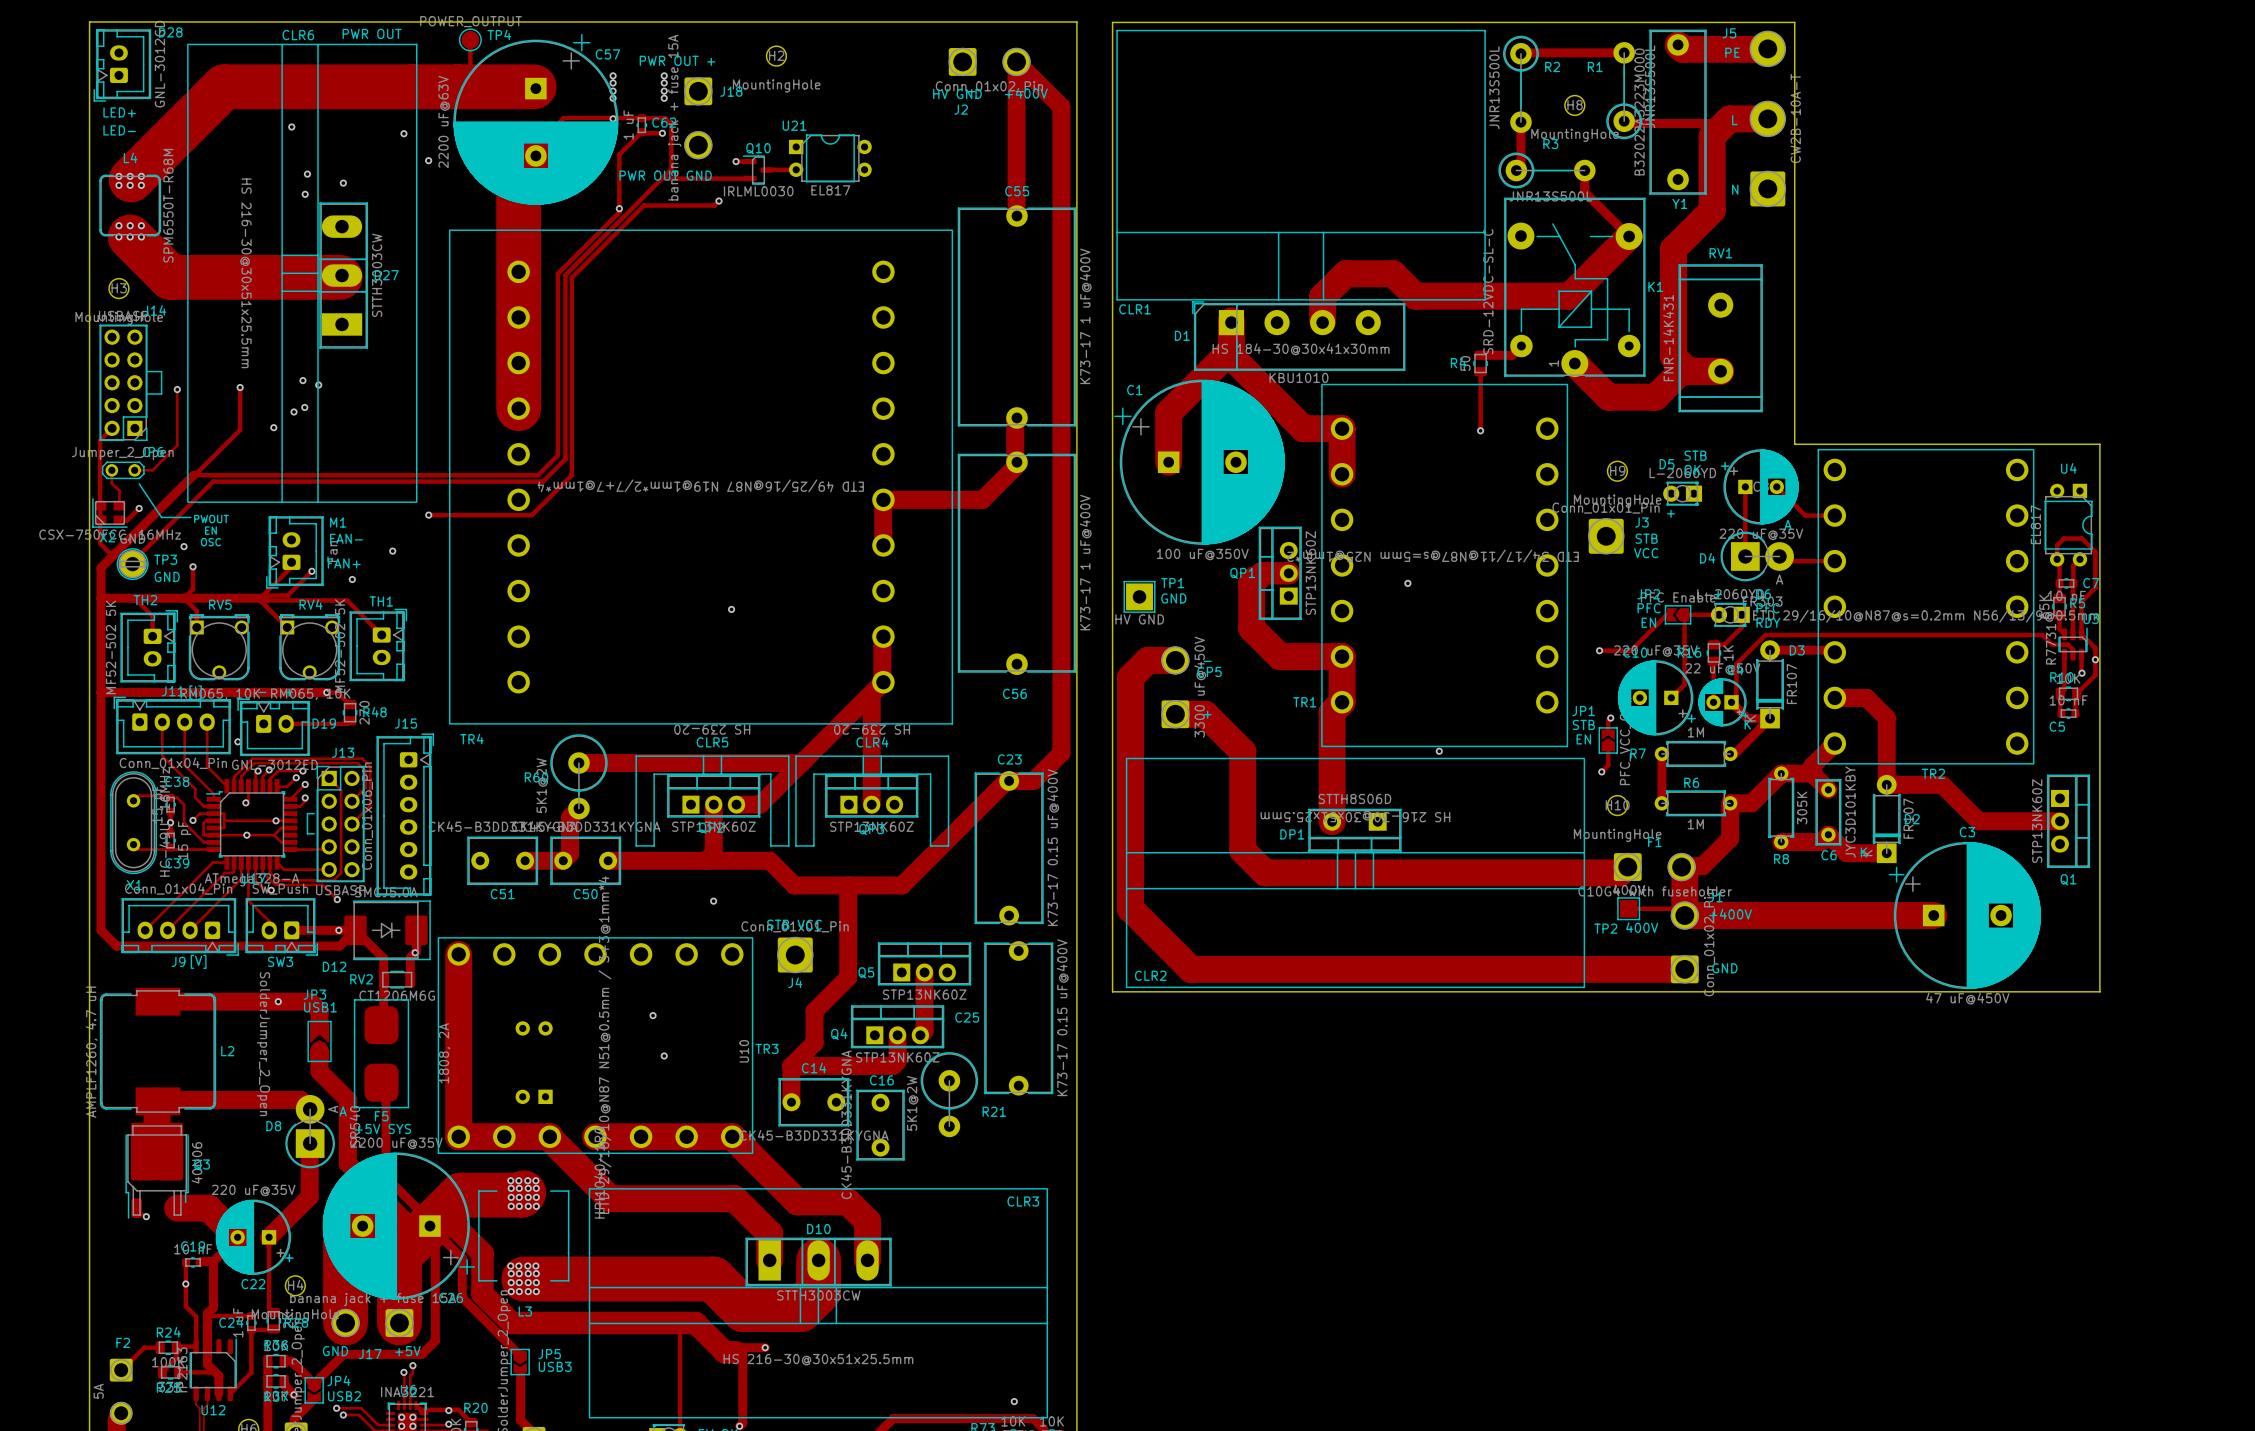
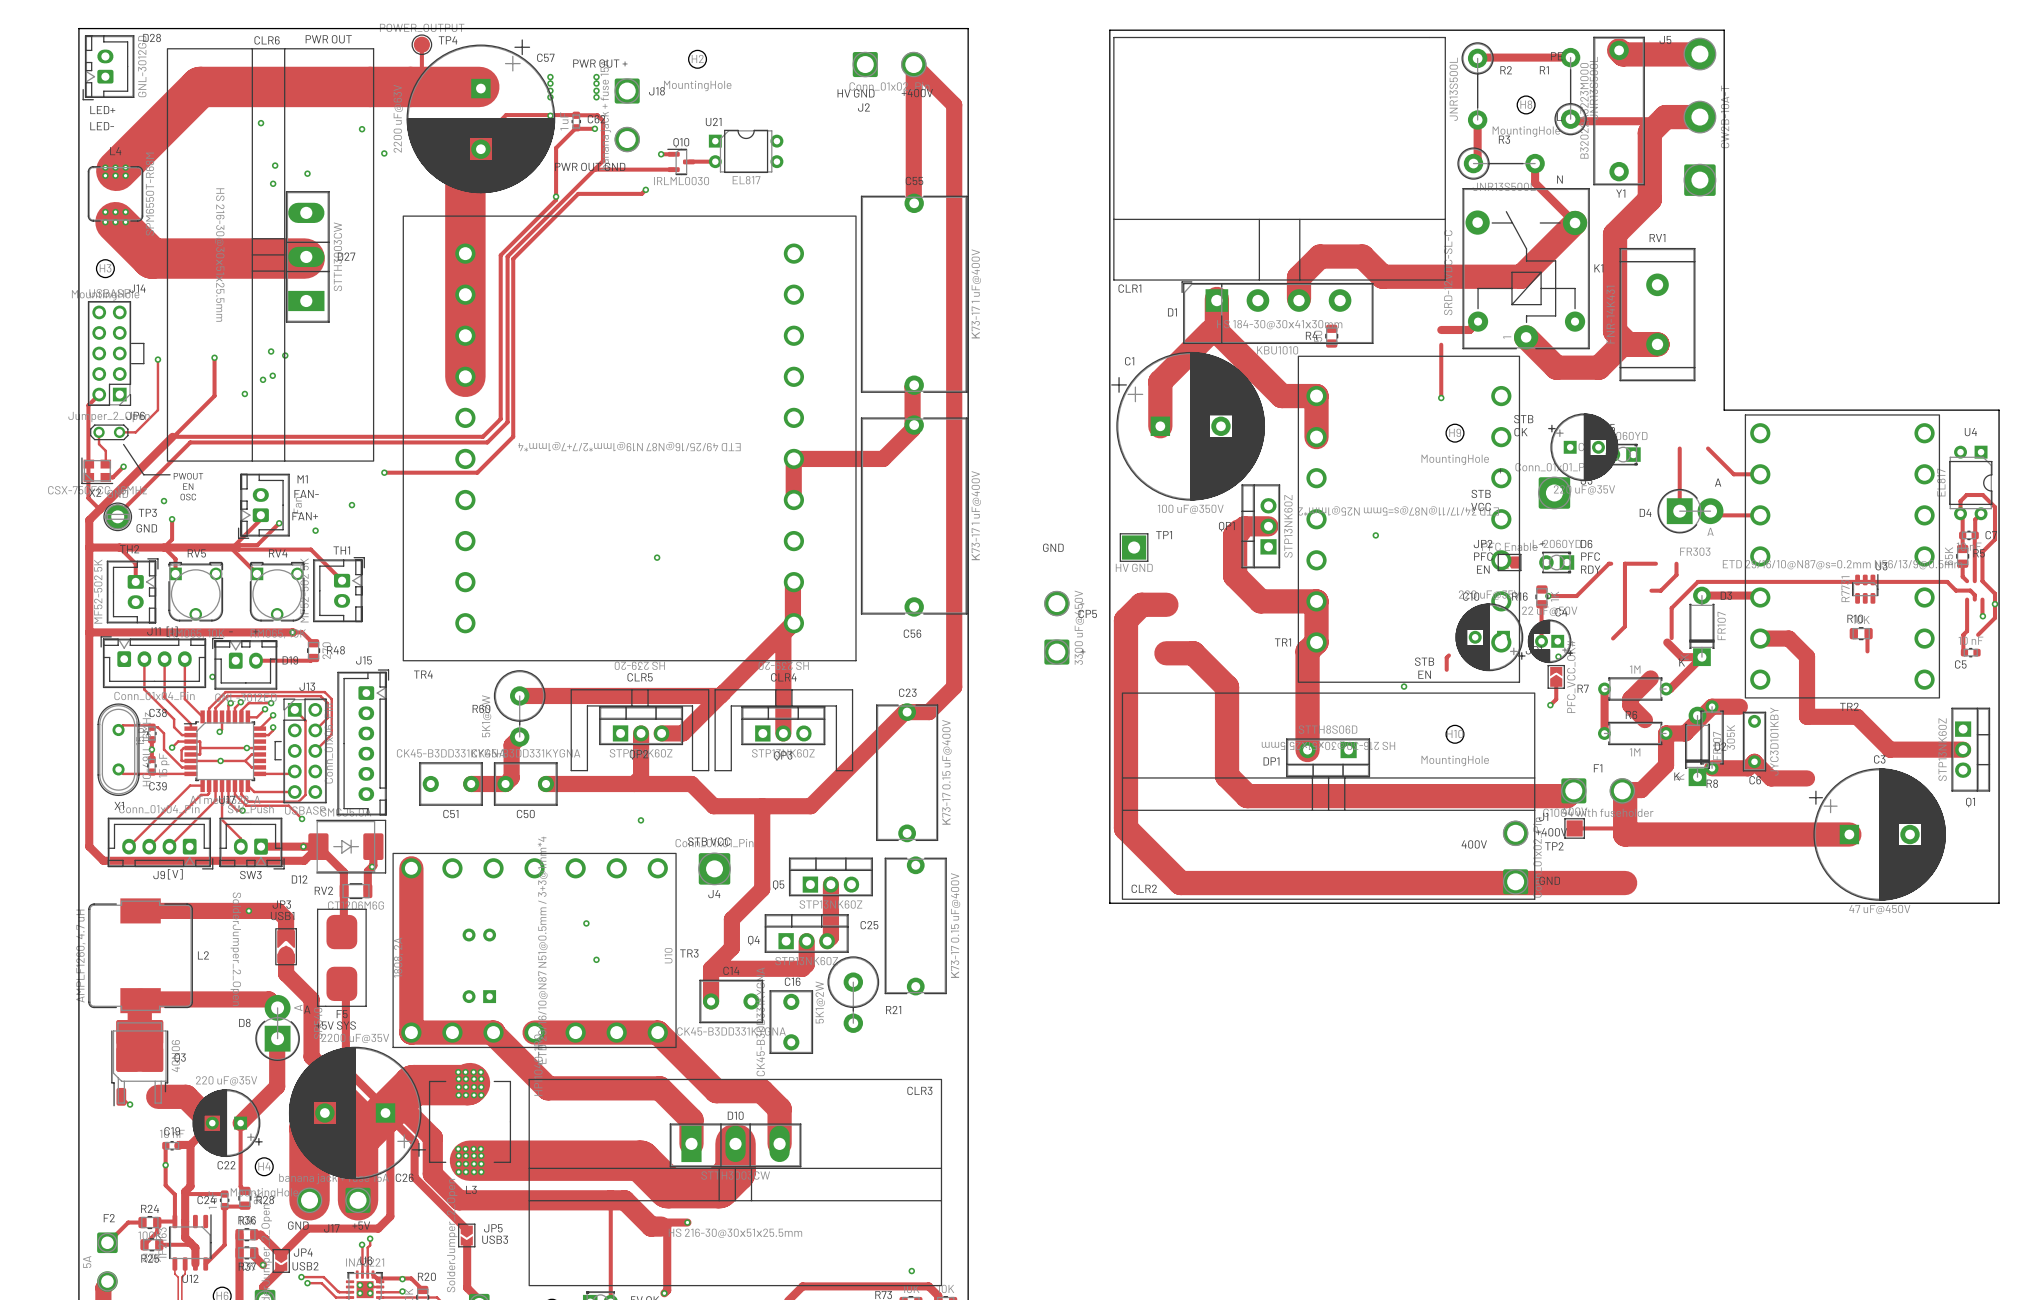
board edge: (1112, 22) (1794, 22) (1794, 444) (2099, 444) (2099, 991) (1112, 991) (1112, 22) -> (1109, 30) (1724, 30) (1724, 410) (1999, 410) (1999, 903) (1109, 903) (1109, 30)
track: (1678, 44) (1682, 49) (1767, 49) -> (1619, 50) (1623, 54) (1699, 54)
track: (1521, 52) (1624, 52) -> (1478, 57) (1570, 57)
R2 position: (1520, 84) -> (1477, 86)
R1 position: (1624, 90) -> (1570, 91)
H8 position: (1574, 105) -> (1526, 104)
Y1 position: (1678, 112) -> (1619, 111)
track: (1767, 118) (1729, 118) (1712, 136) (1712, 210) (1673, 249) (1673, 356) (1688, 371) -> (1699, 117) (1665, 117) (1649, 132) (1649, 199) (1615, 234) (1615, 331) (1628, 344)
J5 position: (1767, 118) -> (1699, 117)
track: (1520, 122) (1520, 165) (1516, 170) -> (1477, 119) (1477, 159) (1473, 163)
track: (1626, 123) (1763, 123) -> (1572, 121) (1695, 121)
CLR1 position: (1301, 165) -> (1279, 158)
R3 position: (1547, 170) -> (1501, 163)
track: (1584, 170) (1584, 192) (1629, 236) (1569, 296) (1415, 296) (1393, 273) (1345, 273) (1322, 297) (1322, 320) -> (1535, 163) (1535, 183) (1575, 222) (1521, 276) (1382, 276) (1362, 256) (1320, 256) (1299, 277) (1299, 298)
K1 position: (1574, 287) -> (1526, 268)
track: (1231, 320) (1231, 356) (1303, 428) (1342, 428) (1342, 474) -> (1216, 298) (1216, 331) (1281, 396) (1316, 396) (1316, 437)
D1 position: (1298, 336) -> (1277, 312)
RV1 position: (1720, 338) -> (1657, 314)
track: (1521, 346) (1512, 355) (1480, 355) -> (1478, 321) (1469, 329) (1441, 329)
track: (1224, 356) (1168, 412) (1168, 462) -> (1210, 331) (1160, 381) (1160, 426)
track: (1574, 363) (1608, 397) (1655, 397) (1681, 371) (1720, 371) -> (1526, 337) (1556, 367) (1598, 367) (1622, 344) (1657, 344)
track: (1480, 371) (1480, 430) -> (1441, 344) (1441, 398)
via: (1480, 430) -> none
via: none -> (1441, 398)
C1 position: (1199, 462) -> (1188, 426)
track: (1745, 486) (1745, 556) -> (1679, 448) (1679, 511)
track: (1776, 486) (1805, 515) (1834, 515) -> (1708, 448) (1733, 474) (1760, 474)
D5 position: (1682, 493) -> (1623, 454)
U4 position: (2068, 525) -> (1970, 482)
J3 position: (1606, 536) -> (1554, 492)
D4 position: (1757, 556) -> (1690, 511)
track: (2057, 559) (2057, 545) (2064, 538) (2081, 538) (2095, 552) (2095, 587) (2081, 601) (2081, 634) (2095, 648) (2095, 675) (2076, 693) -> (1960, 513) (1960, 501) (1966, 495) (1982, 495) (1994, 507) (1994, 539) (1982, 551) (1982, 581) (1994, 593) (1994, 617) (1978, 634)
track: (2079, 559) (2073, 565) (2073, 583) -> (1981, 513) (1975, 519) (1975, 535)
track: (1784, 561) (1834, 561) -> (1714, 515) (1760, 515)
track: (2059, 561) (2059, 598) -> (1962, 515) (1962, 548)
TR1 position: (1444, 565) -> (1408, 519)
QP1 position: (1280, 573) -> (1260, 526)
track: (1288, 573) (1261, 573) (1251, 583) (1251, 628) (1280, 656) (1342, 656) (1342, 702) (1332, 712) (1332, 821) -> (1268, 526) (1244, 526) (1235, 535) (1235, 575) (1260, 601) (1316, 601) (1316, 642) (1307, 651) (1307, 750)
via: (1407, 583) -> none
C7 position: (2066, 583) -> (1968, 535)
track: (2072, 583) (2072, 634) -> (1974, 535) (1974, 581)
via: none -> (1375, 535)
TP1 position: (1139, 596) -> (1134, 547)
TR2 position: (1926, 606) -> (1842, 556)
R5 position: (2059, 606) -> (1962, 556)
track: (1669, 614) (1666, 614) (1630, 650) (1599, 650) -> (1611, 563) (1608, 563) (1576, 596) (1548, 596)
track: (1718, 614) (1684, 614) (1684, 684) (1671, 697) -> (1655, 563) (1624, 563) (1624, 626) (1613, 638)
track: (1741, 614) (1741, 627) (1724, 644) (1713, 644) -> (1676, 563) (1676, 575) (1660, 590) (1651, 590)
track: (2059, 614) (2059, 629) (2064, 634) -> (1962, 563) (1962, 576) (1967, 581)
via: (1599, 650) -> none
track: (1770, 650) (1832, 650) -> (1701, 595) (1758, 595)
via: none -> (1548, 596)
track: (2064, 654) (2064, 689) (2060, 693) (2060, 712) -> (1967, 599) (1967, 631) (1963, 634) (1963, 651)
track: (2072, 654) (2072, 649) (2068, 644) (2052, 644) (2042, 635) (1765, 635) (1736, 664) (1736, 697) -> (1974, 599) (1974, 595) (1970, 590) (1955, 590) (1947, 581) (1697, 581) (1671, 608) (1671, 638)
track: (2081, 654) (2081, 673) -> (1982, 599) (1982, 616)
via: (2095, 659) -> none
track: (1175, 660) (1147, 660) (1130, 677) (1130, 908) (1191, 969) (1684, 969) -> (1166, 604) (1141, 604) (1125, 620) (1125, 828) (1180, 883) (1625, 883)
via: none -> (1994, 604)
via: (2081, 673) -> none
via: none -> (1982, 616)
D3 position: (1770, 684) -> (1701, 626)
track: (1834, 697) (1866, 697) (1886, 718) (1886, 784) (1942, 784) (1978, 821) (2060, 821) -> (1760, 638) (1788, 638) (1807, 656) (1807, 716) (1857, 716) (1889, 749) (1963, 749)
track: (1731, 702) (1747, 718) (1770, 718) (1734, 753) (1730, 753) -> (1667, 642) (1681, 657) (1701, 657) (1670, 689) (1666, 689)
C5 position: (2068, 713) -> (1970, 652)
track: (1175, 714) (1205, 714) (1242, 751) (1242, 850) (1265, 872) (1619, 872) (1626, 866) -> (1166, 653) (1193, 653) (1227, 686) (1227, 775) (1247, 796) (1566, 796) (1572, 790)
via: (1610, 718) -> none
via: none -> (1558, 656)
JP1 position: (1608, 740) -> (1556, 676)
track: (1608, 747) (1608, 765) (1601, 771) -> (1556, 682) (1556, 699) (1550, 705)
via: (1439, 751) -> none
via: none -> (1404, 686)
track: (1661, 753) (1661, 803) -> (1604, 689) (1604, 733)
R7 position: (1696, 753) -> (1635, 689)
via: (1601, 771) -> none
via: none -> (1550, 705)
track: (1812, 773) (1781, 773) (1751, 803) (1730, 803) (1730, 838) (1702, 866) (1684, 866) -> (1739, 706) (1712, 706) (1685, 733) (1666, 733) (1666, 765) (1641, 790) (1624, 790)
R6 position: (1696, 803) -> (1635, 733)
R8 position: (1781, 807) -> (1712, 737)
C6 position: (1828, 812) -> (1754, 741)
Q1 position: (2068, 821) -> (1970, 749)
DP1 position: (1354, 830) -> (1328, 757)
track: (1781, 842) (1821, 842) (1828, 834) (1846, 853) (1886, 853) -> (1712, 768) (1747, 768) (1754, 761) (1771, 778) (1807, 778)
F1 position: (1654, 867) -> (1598, 790)
track: (1681, 867) (1684, 870) (1684, 915) (1933, 915) -> (1622, 790) (1625, 793) (1625, 834) (1849, 834)
CLR2 position: (1355, 872) -> (1328, 796)
TP2 position: (1628, 908) -> (1574, 828)
track: (1635, 908) (1678, 908) -> (1580, 828) (1619, 828)
C3 position: (1964, 915) -> (1877, 834)

